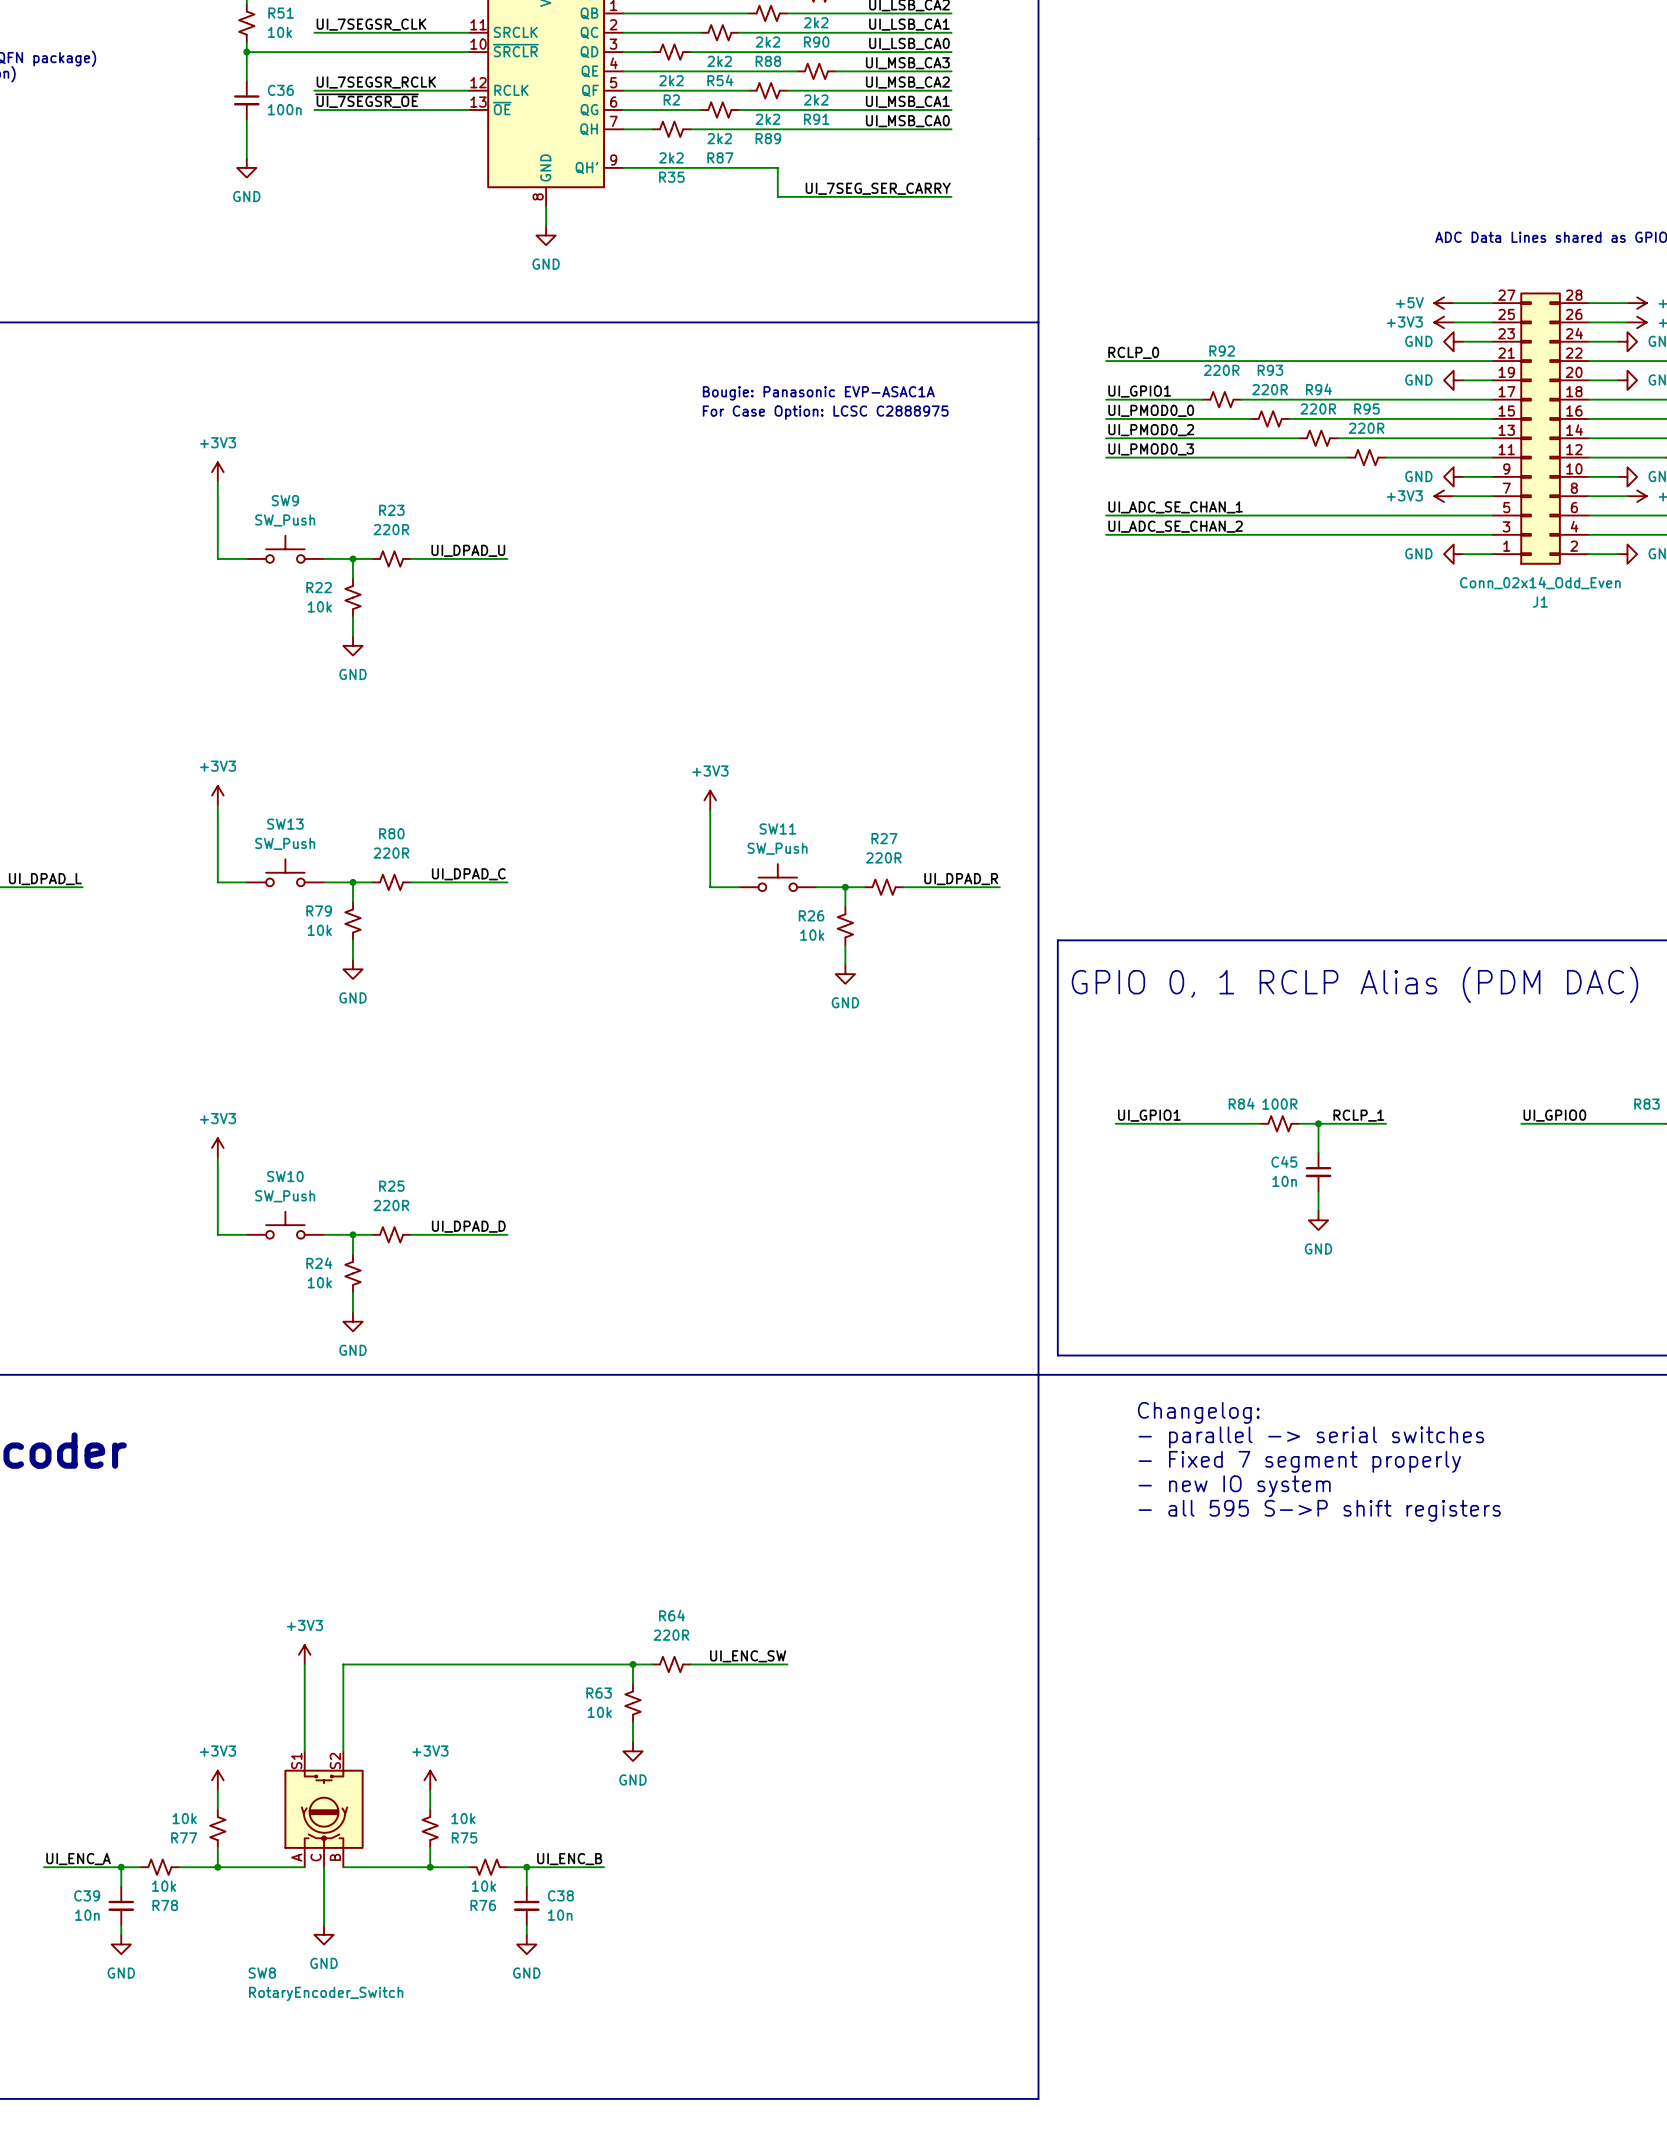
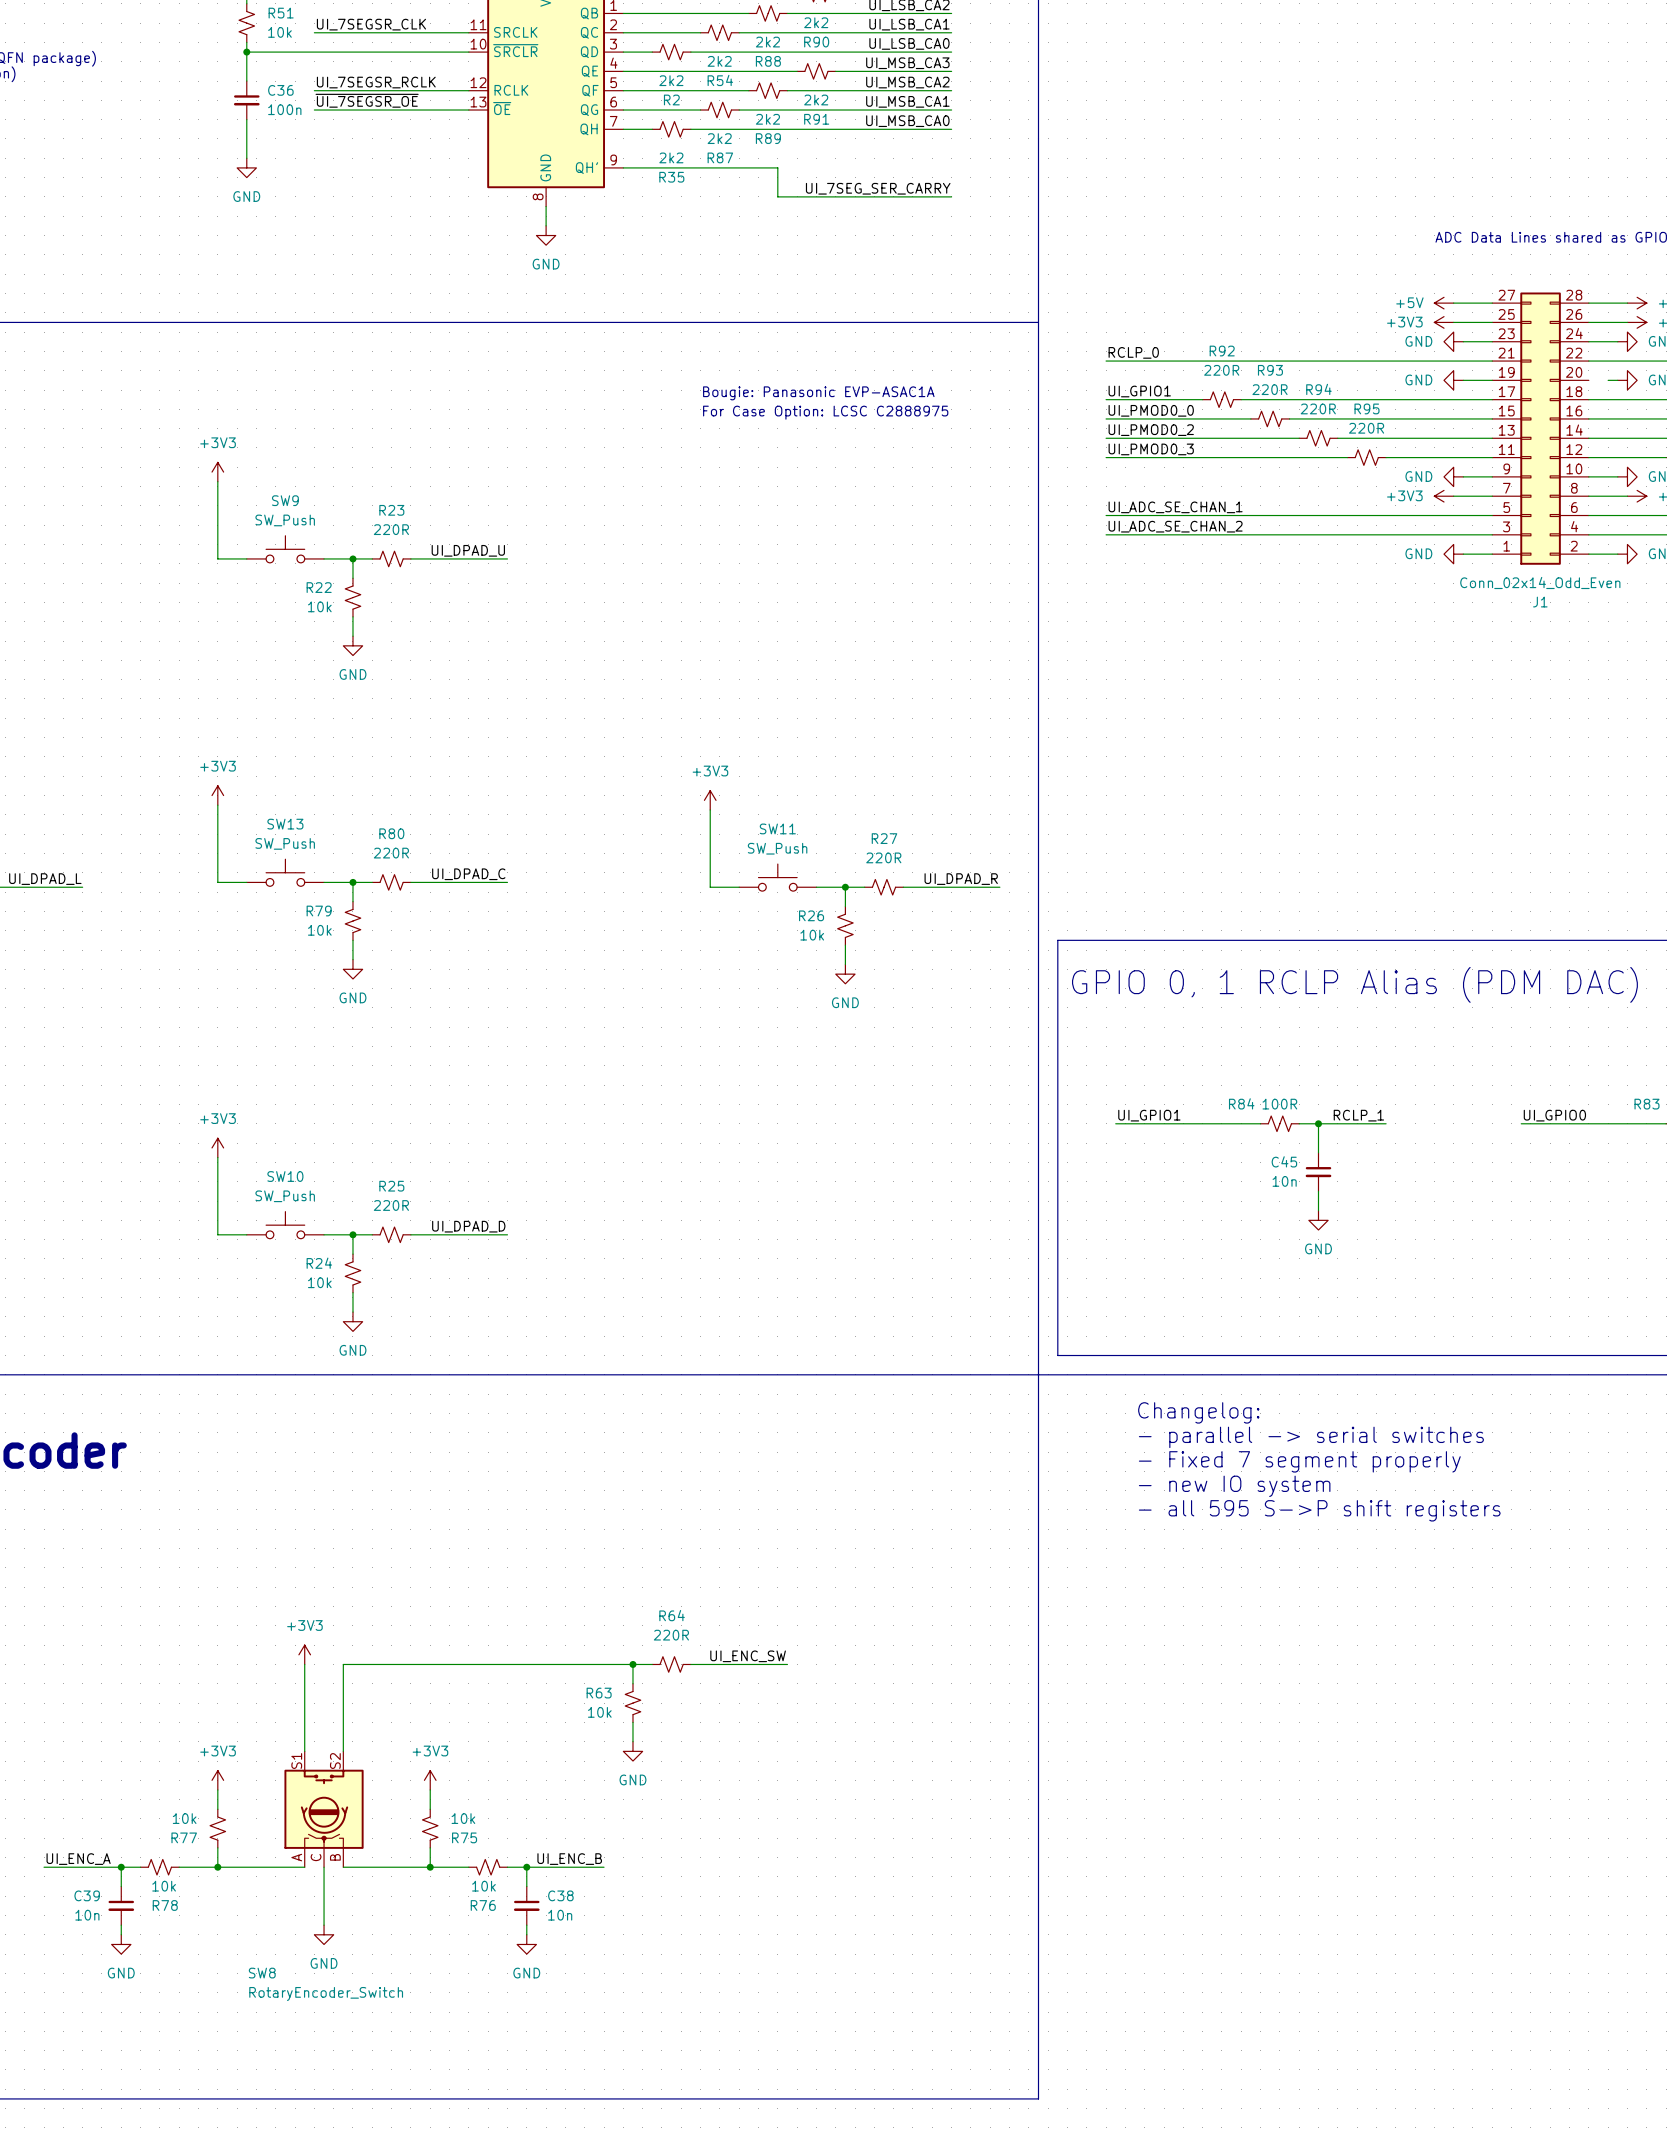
wire: (1588, 380) (1608, 380) -> none

